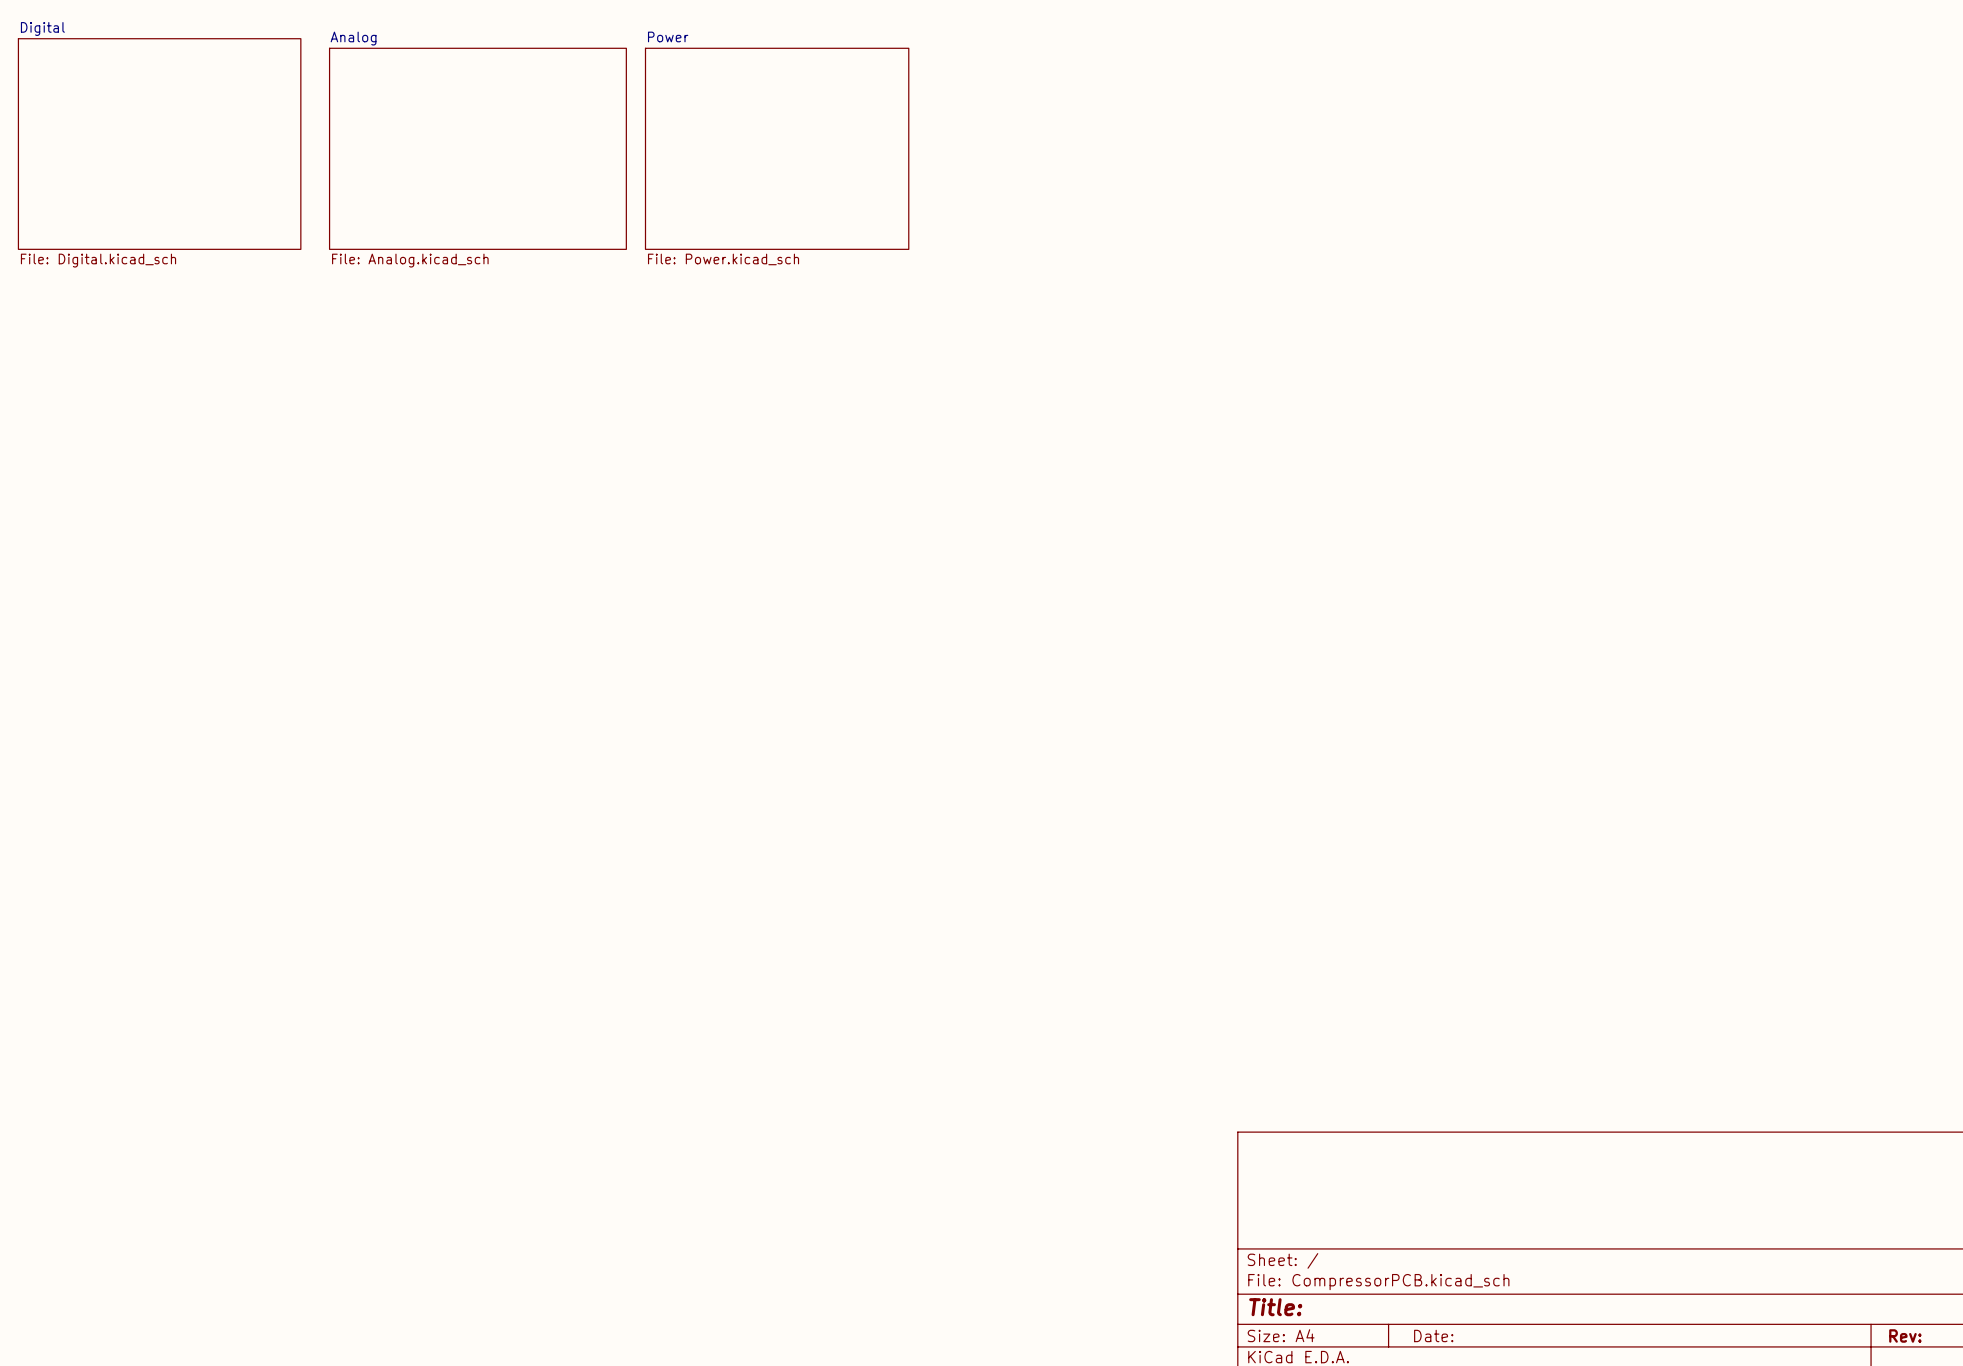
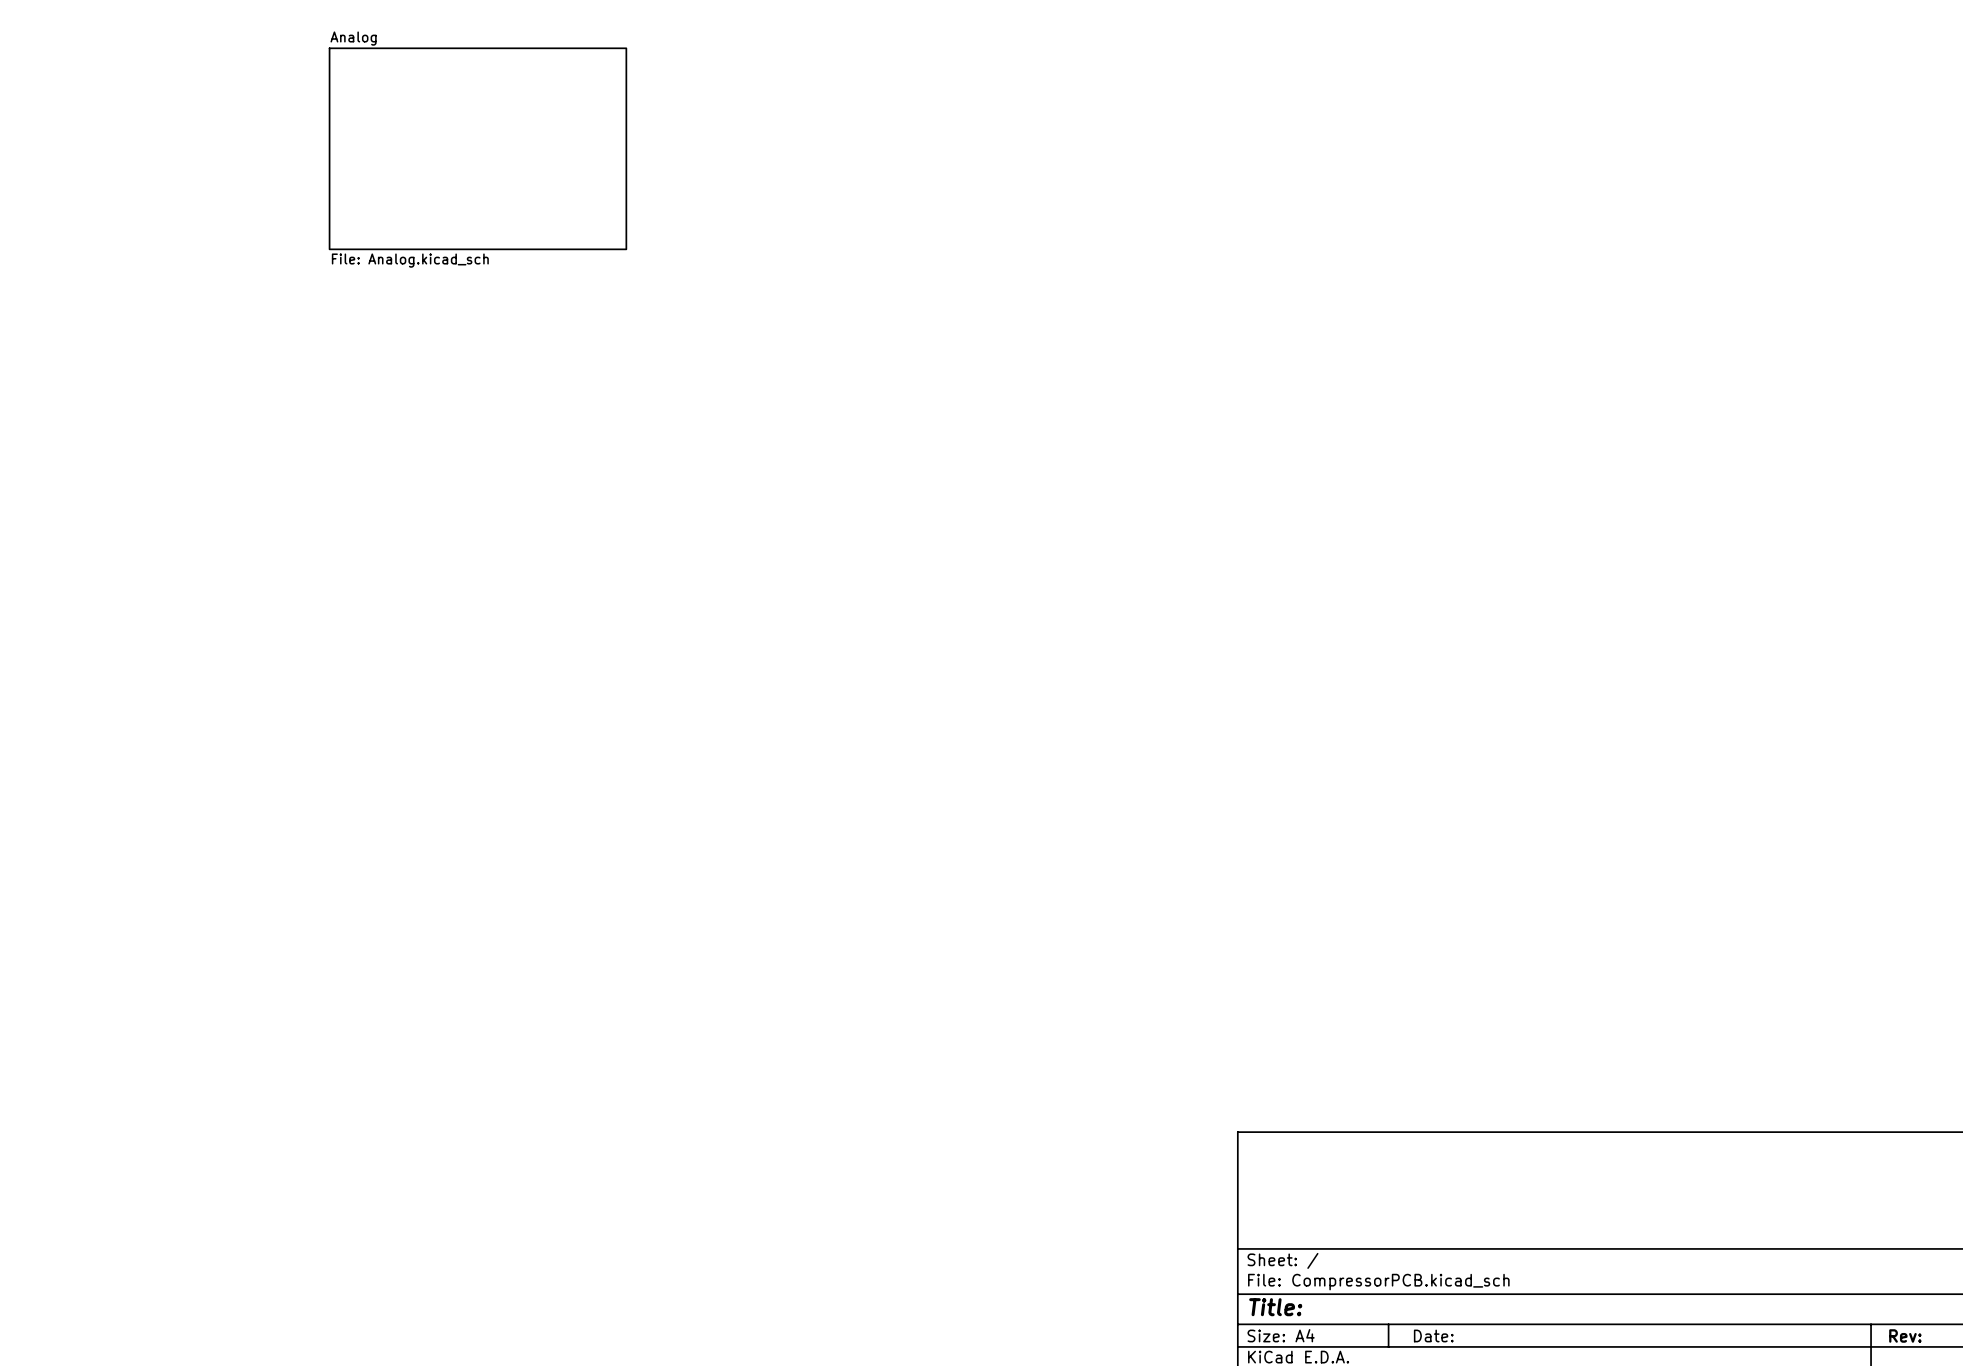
sheet Digital: File: Digital.kicad_sch (159, 144) -> none
sheet Power: File: Power.kicad_sch (777, 148) -> none

